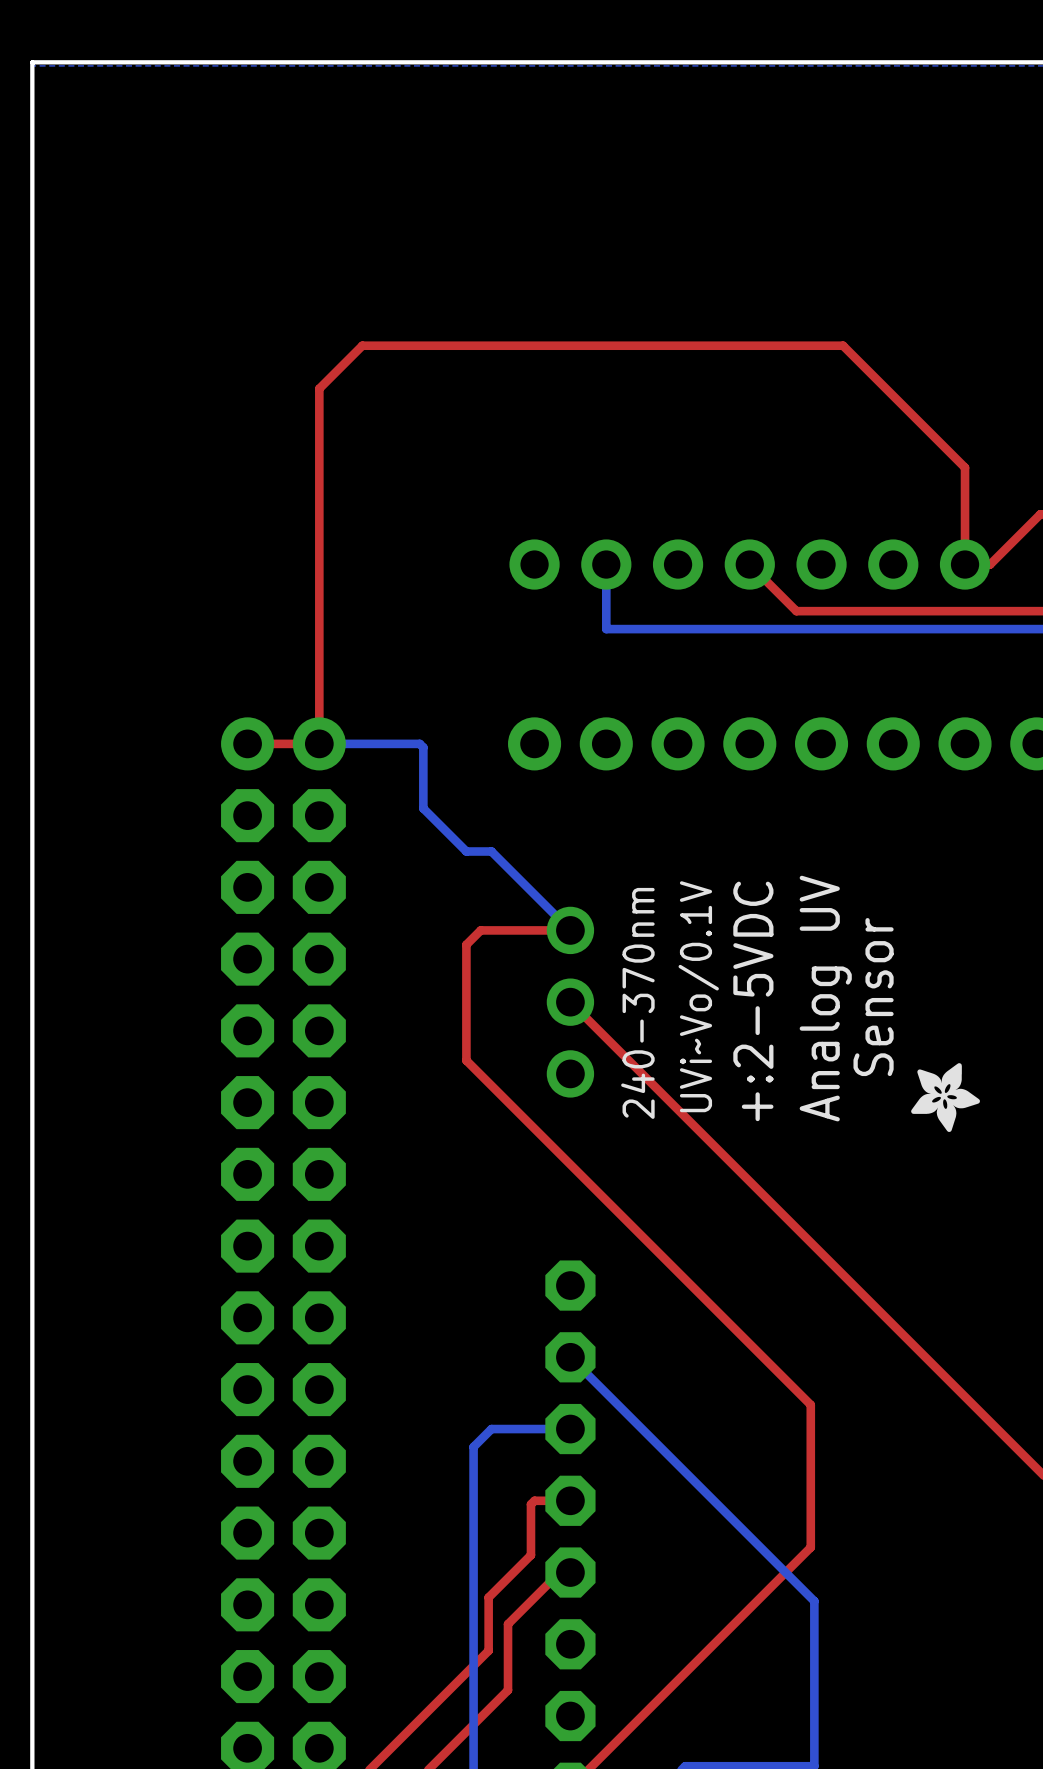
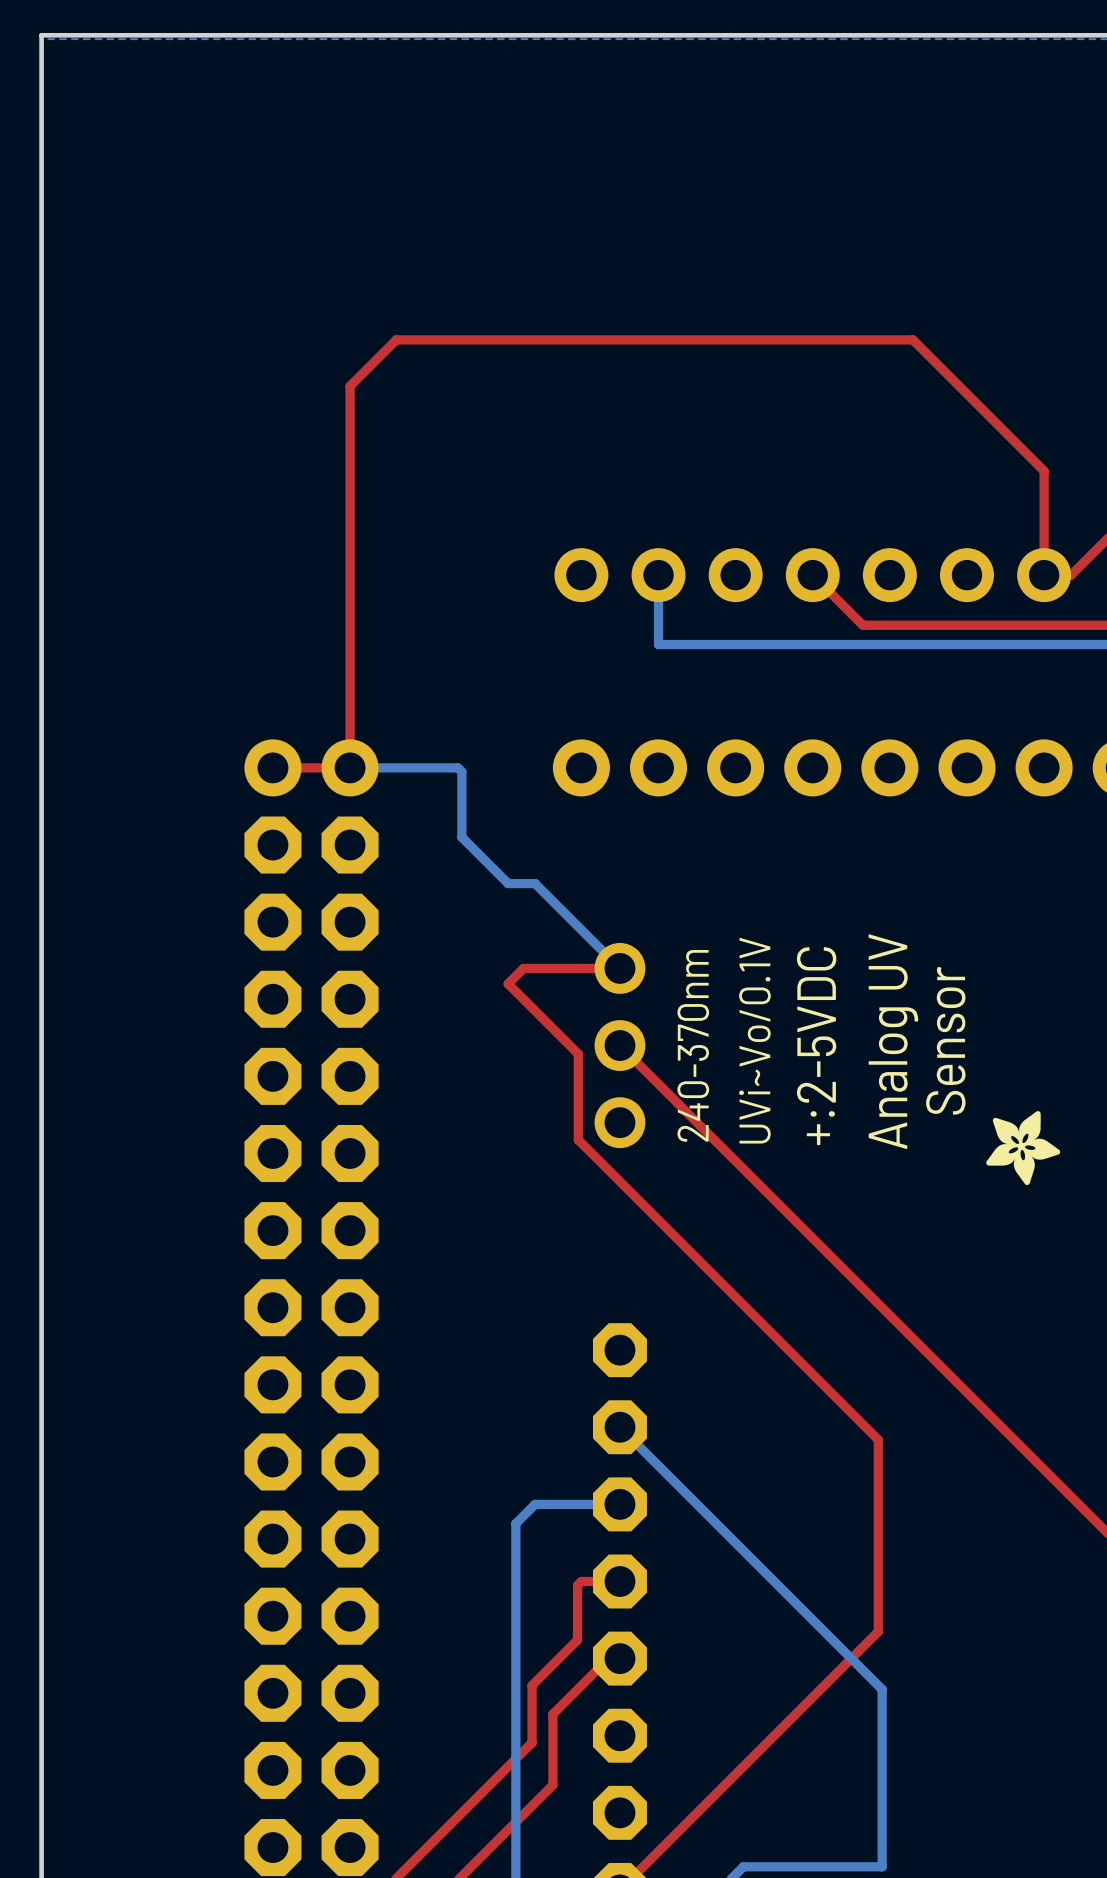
top track: (466, 944) (466, 1060) (810, 1404) -> (508, 983) (578, 1054) (578, 1139) (878, 1439) (878, 1478)

